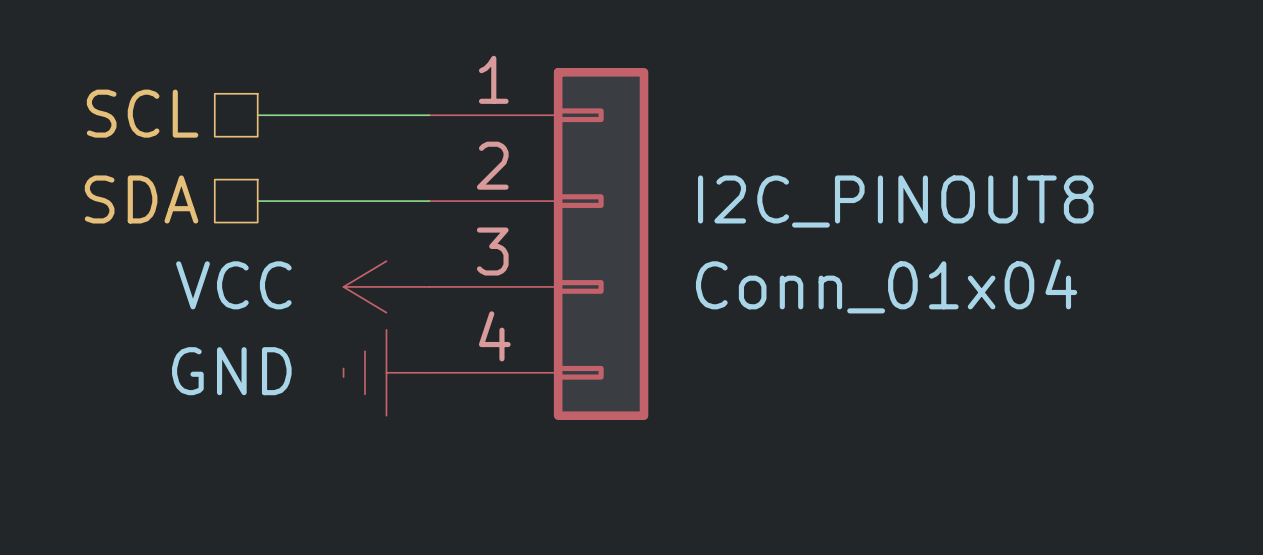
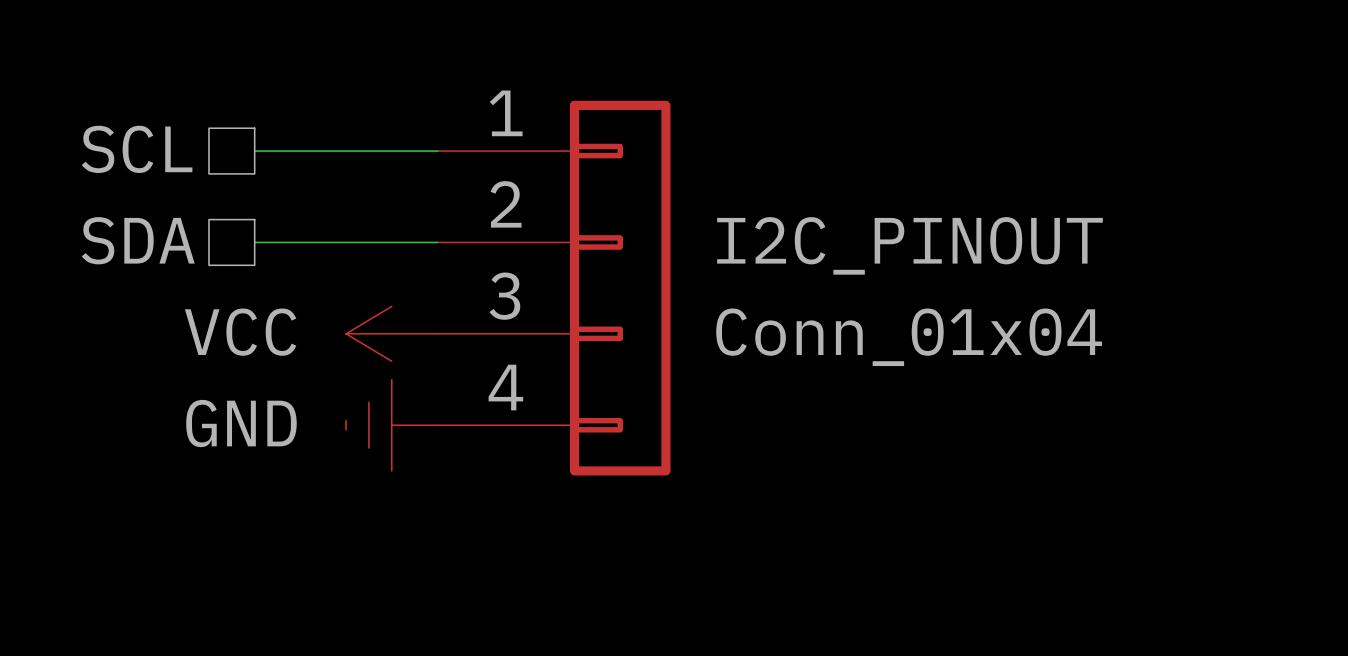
I2C_PINOUT8 name: I2C_PINOUT8 (895, 201) -> I2C_PINOUT (909, 245)

